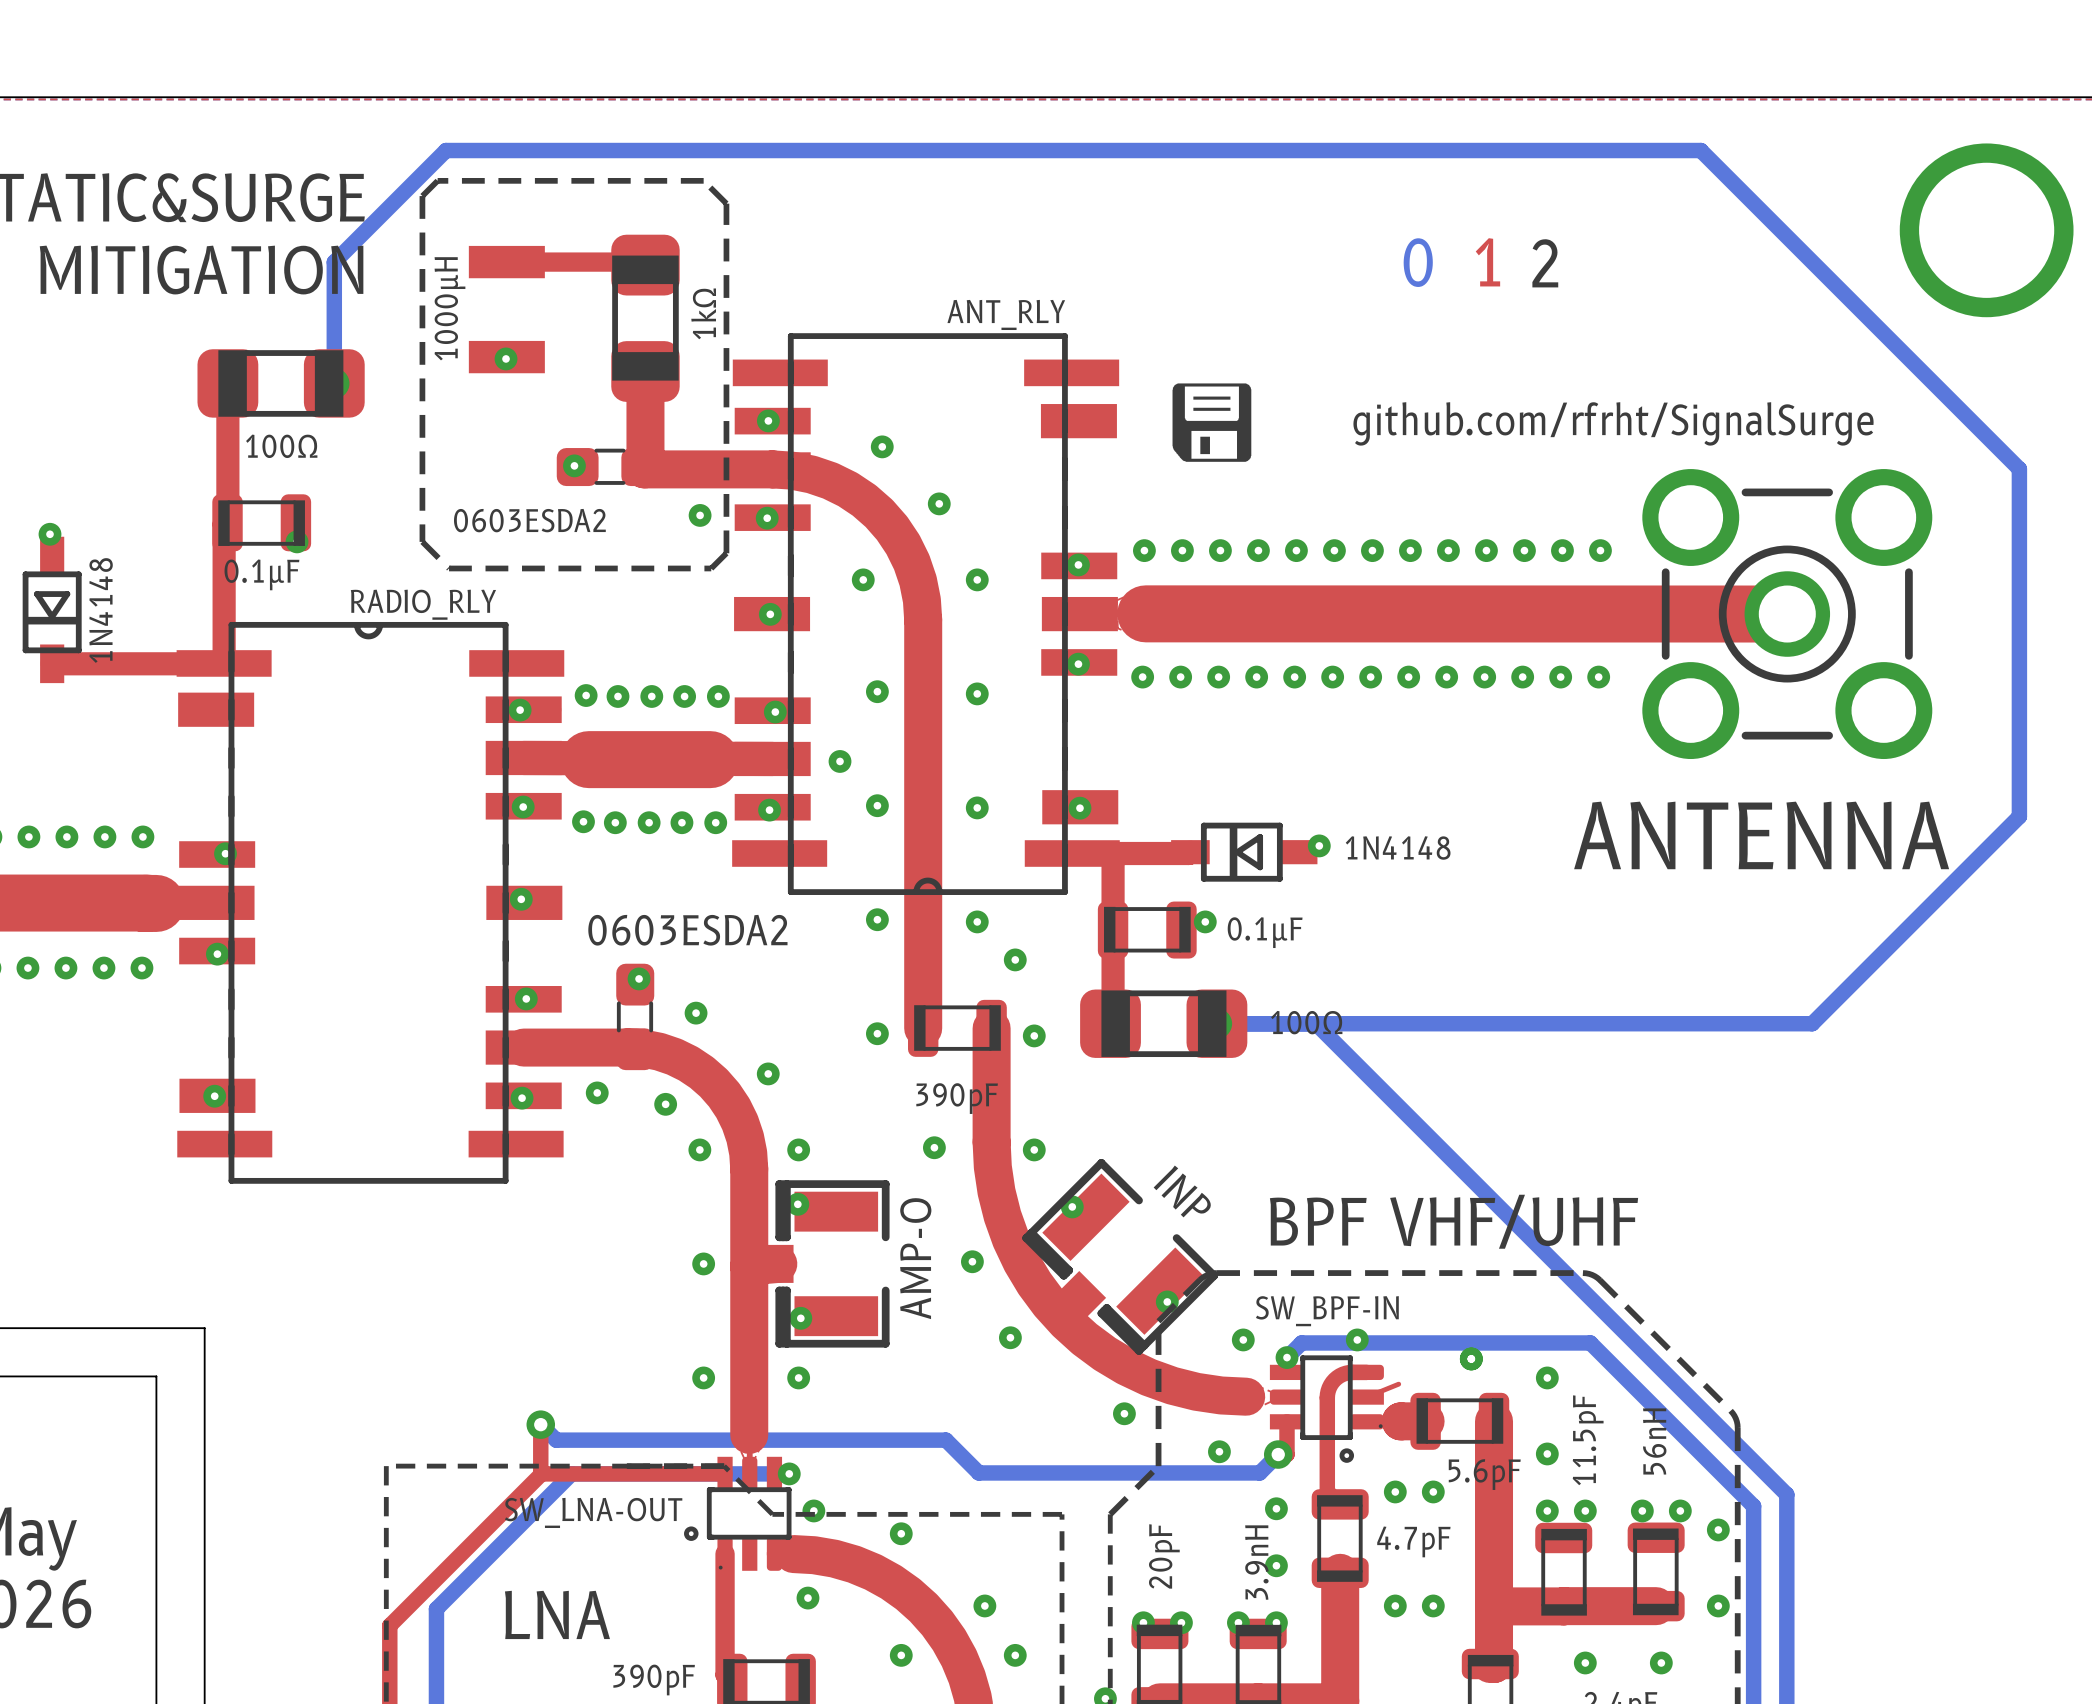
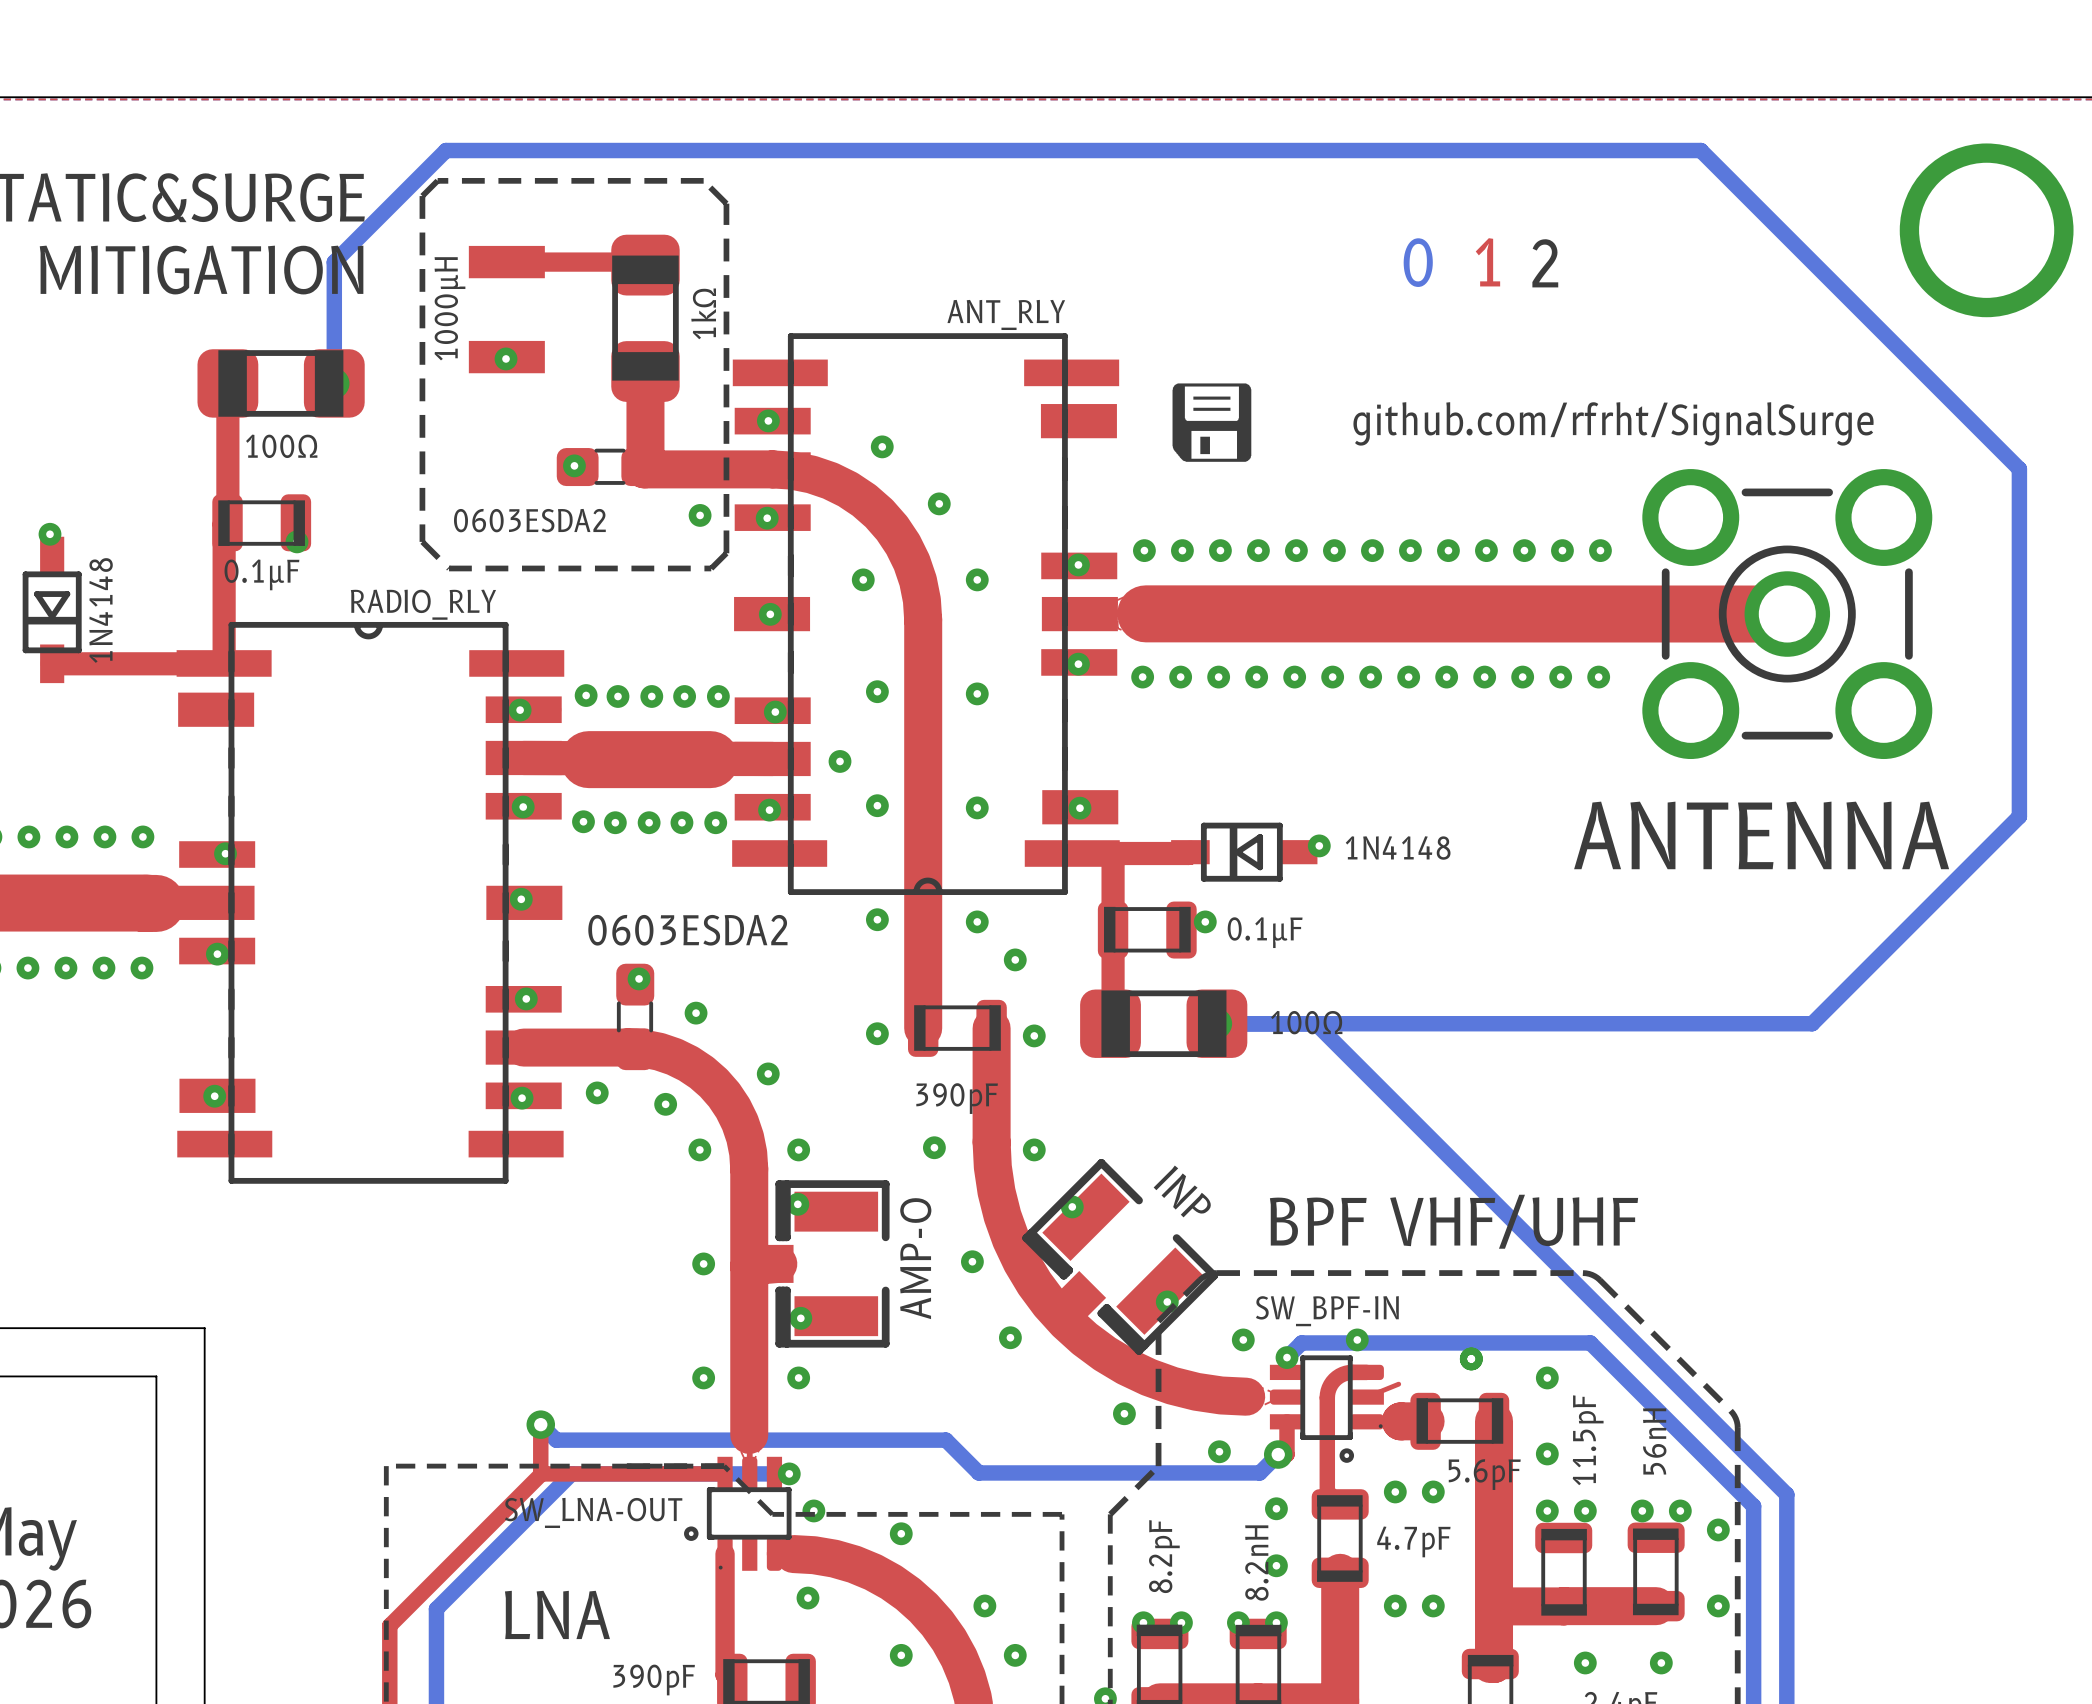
part value: 20pF (1164, 1556) -> 8.2pF (1164, 1556)
part value: 3.9nH (1256, 1562) -> 8.2nH (1256, 1563)

